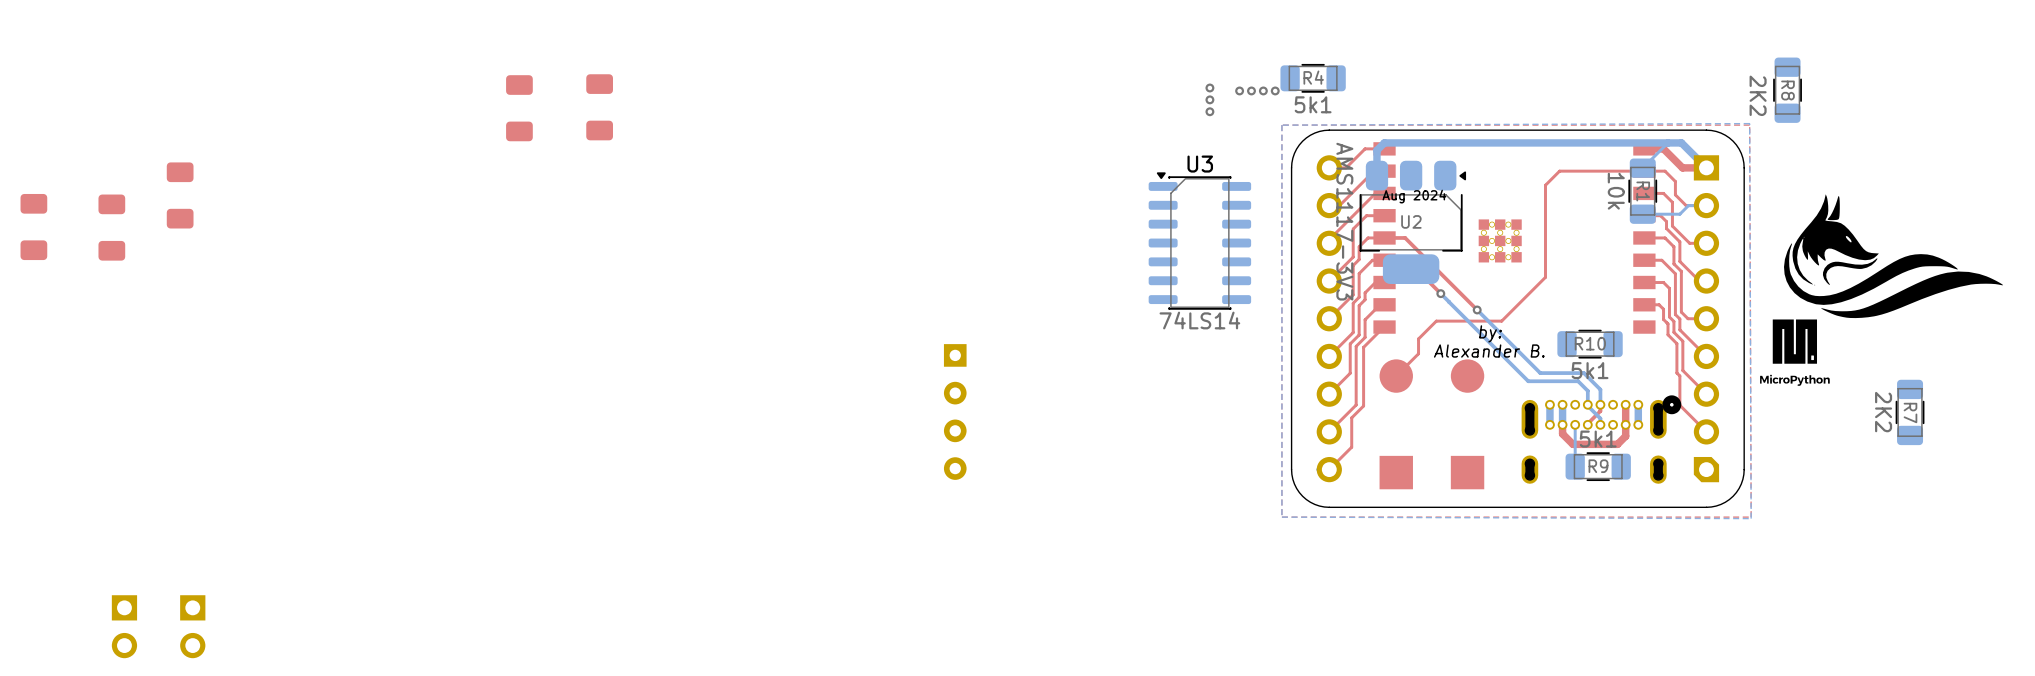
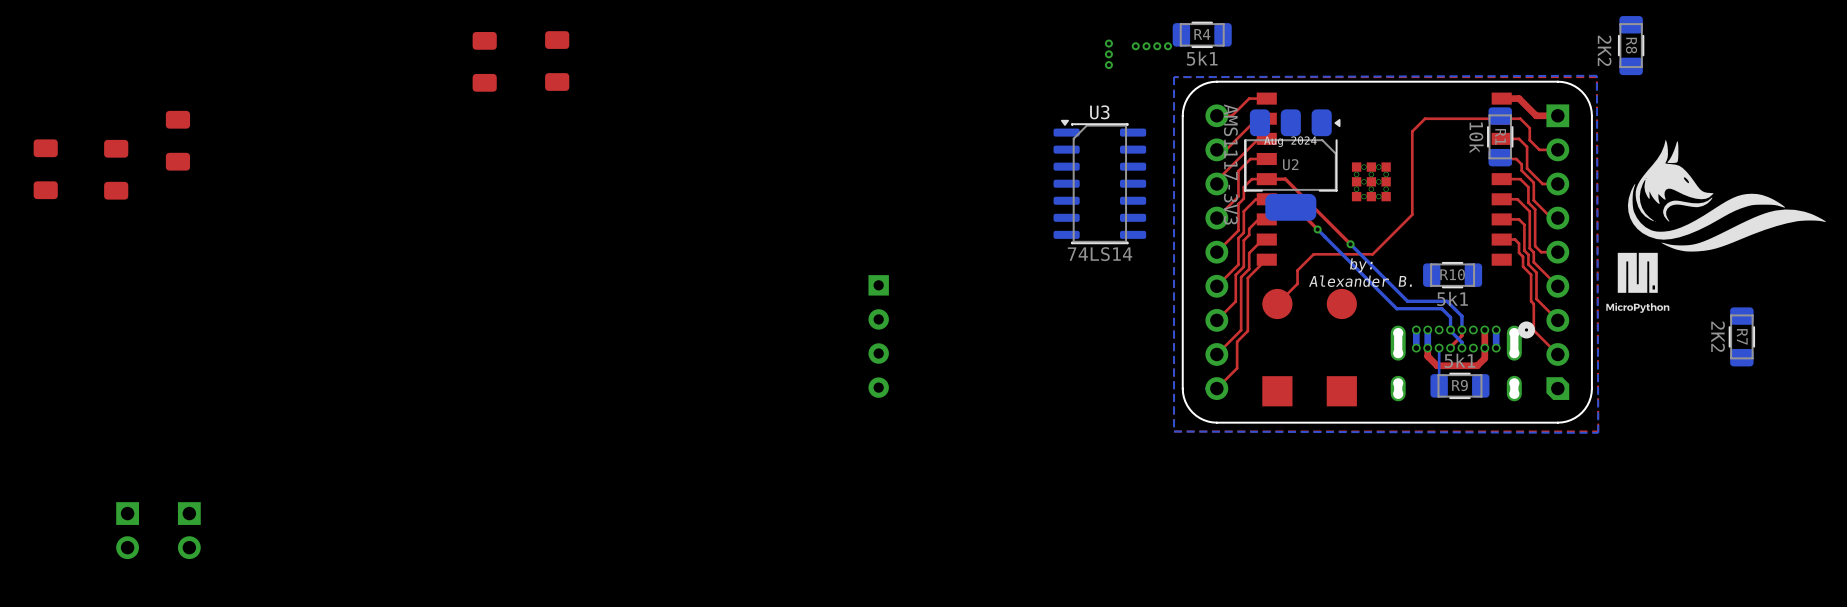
bottom track: (1668, 142) (1642, 168) -> none
bottom track: (1706, 167) (1681, 142) (1384, 142) (1376, 150) (1376, 175) -> none
bottom track: (1706, 205) (1688, 205) (1679, 214) (1642, 214) -> none

